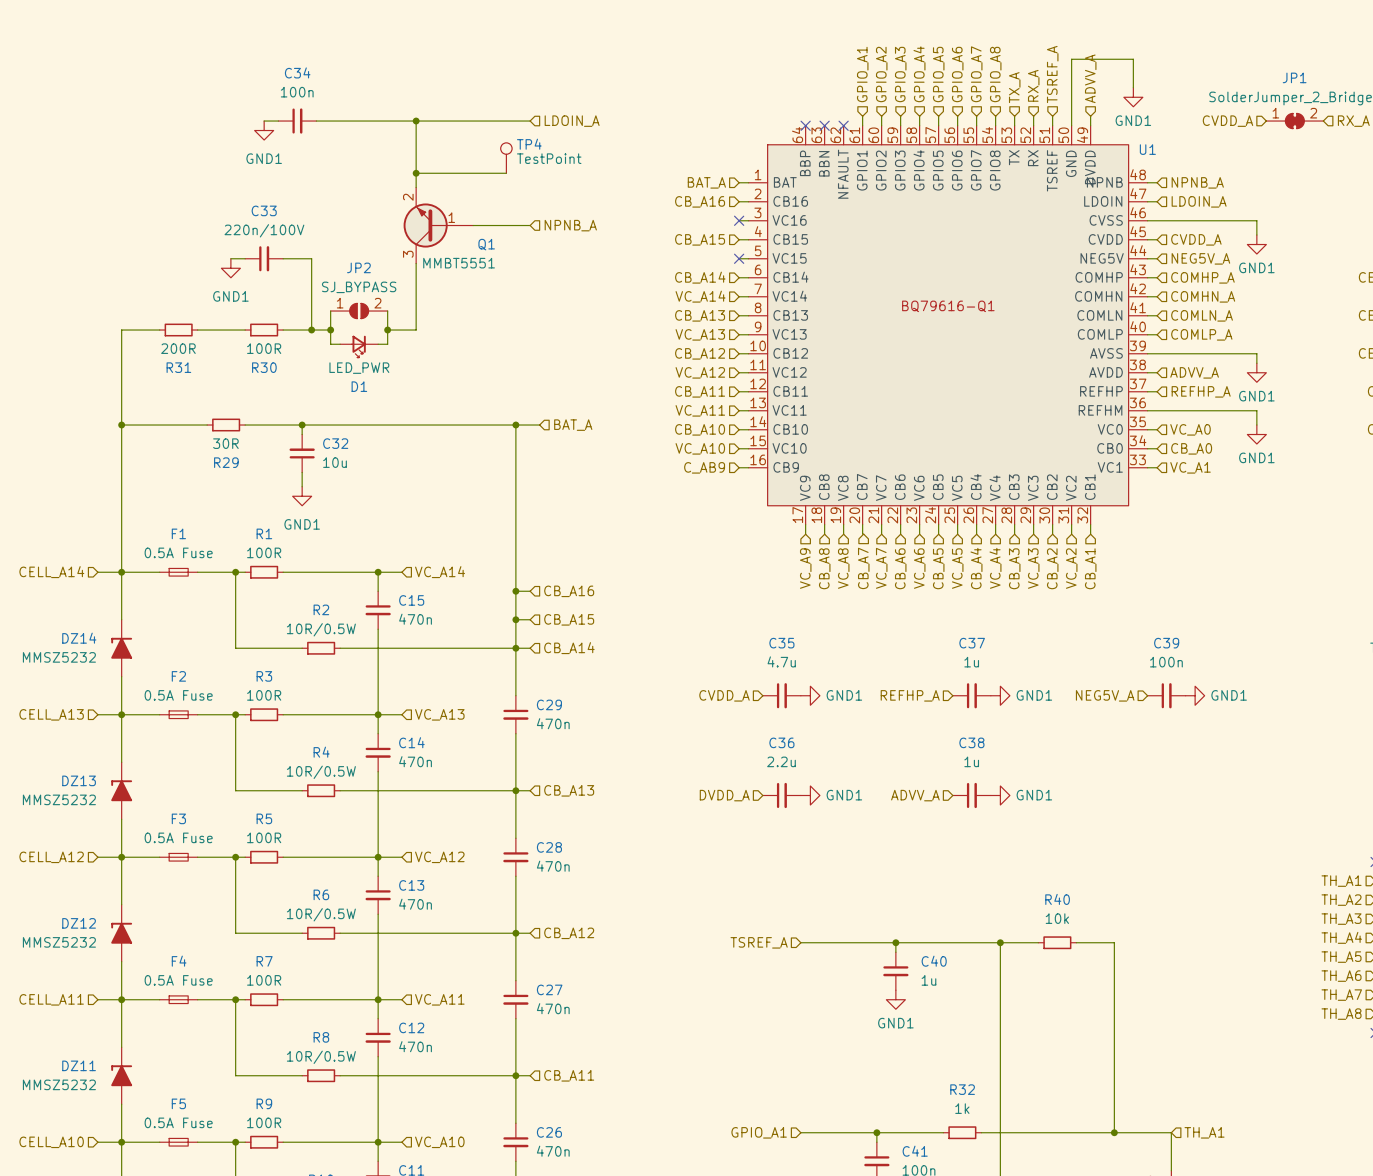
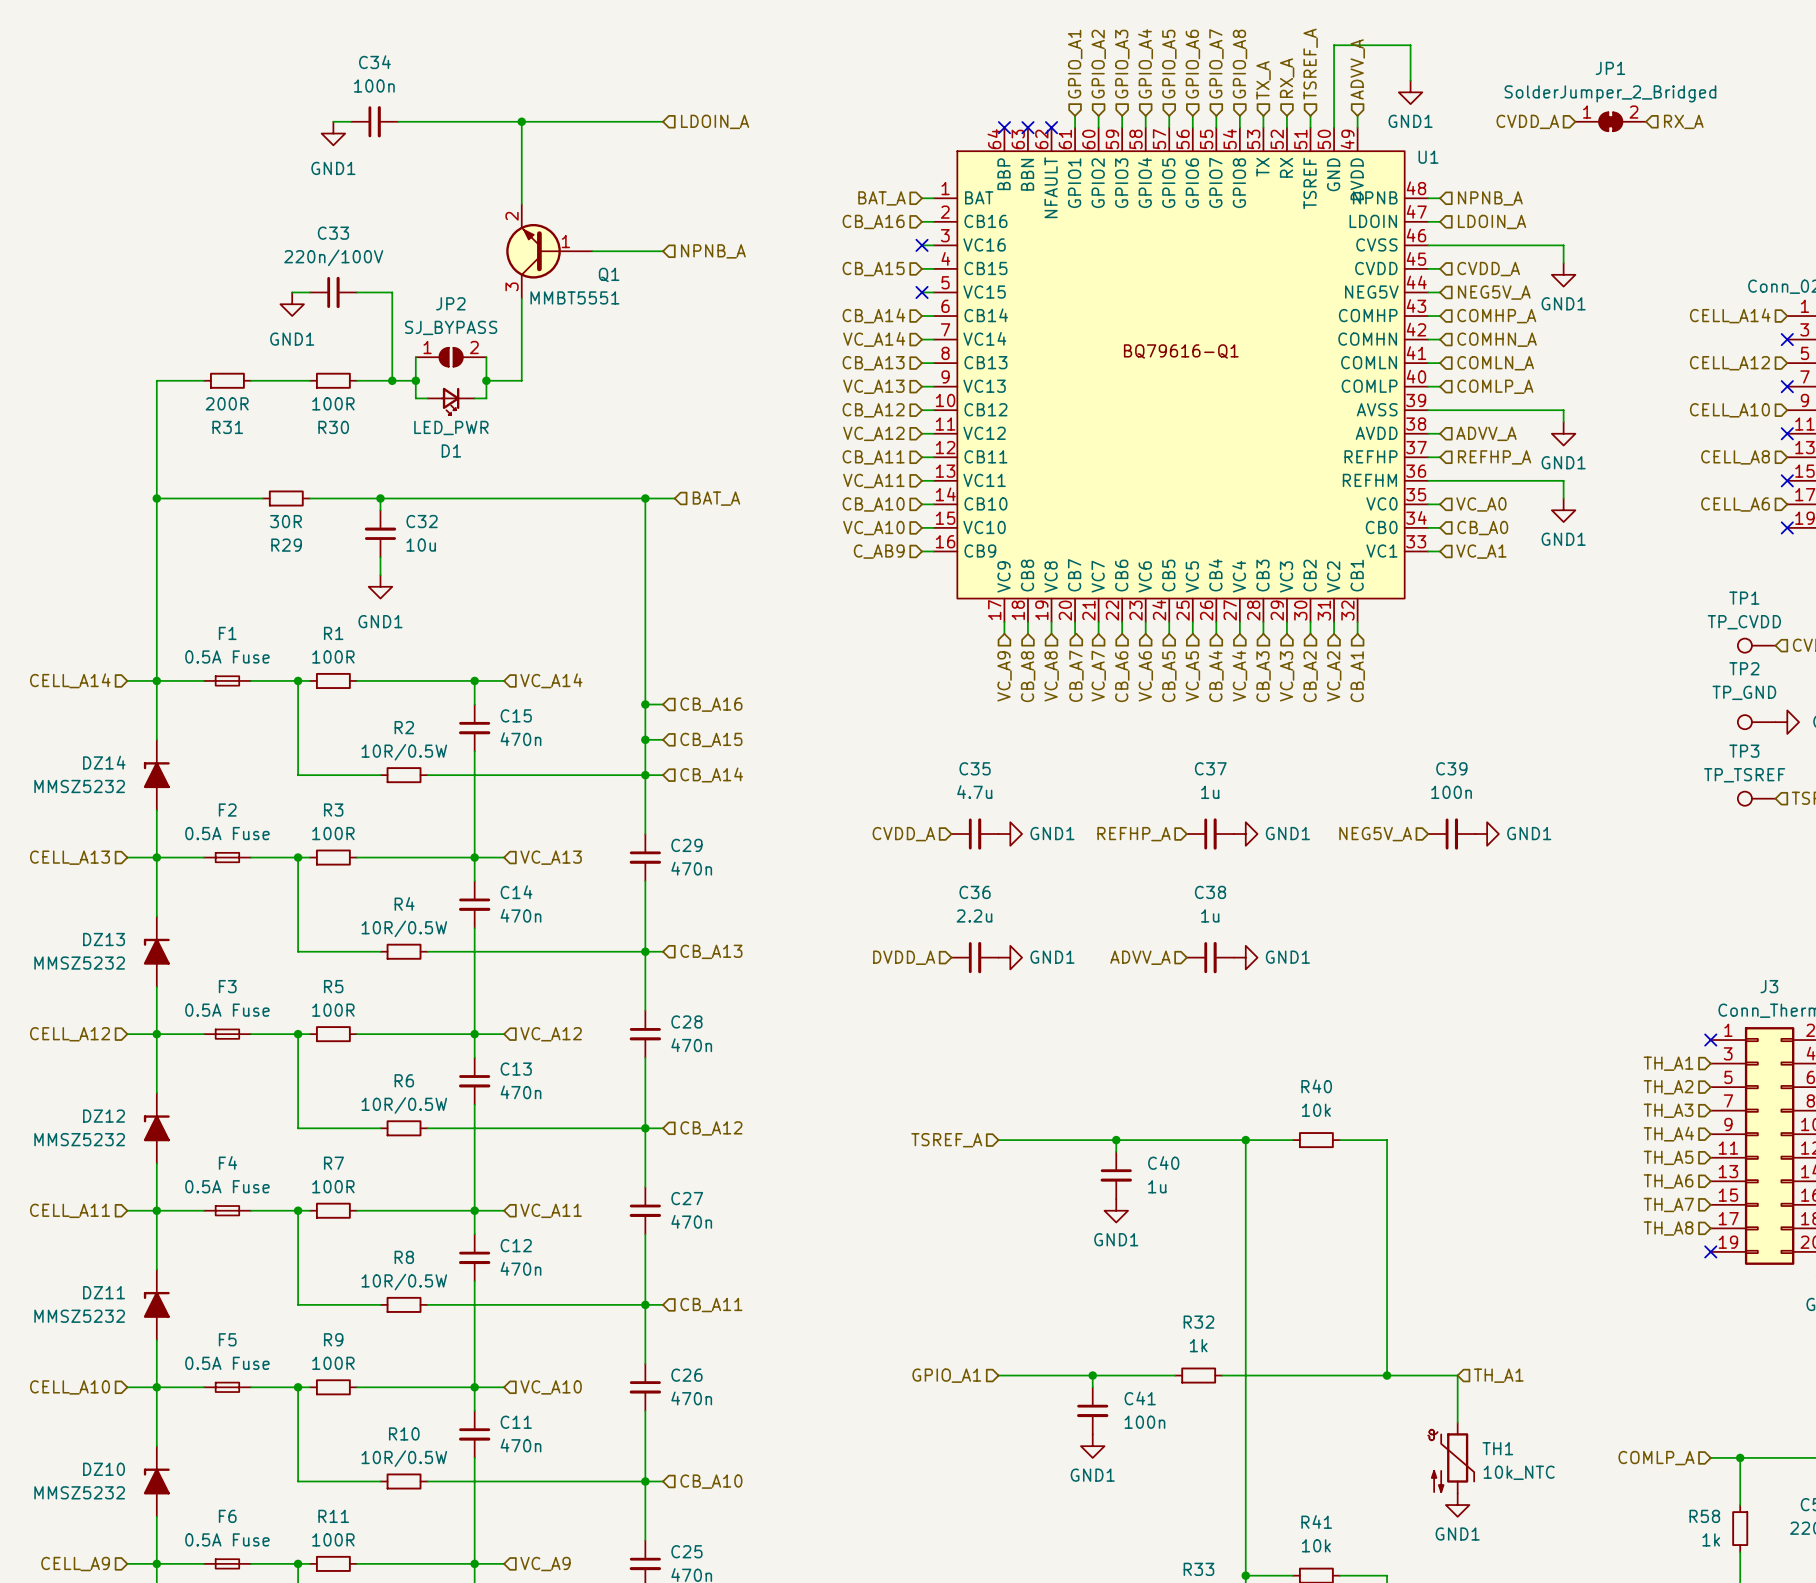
TP4: TestPoint (506, 158) -> none
wire: (416, 173) (506, 173) -> none
junction: (416, 173) -> none

